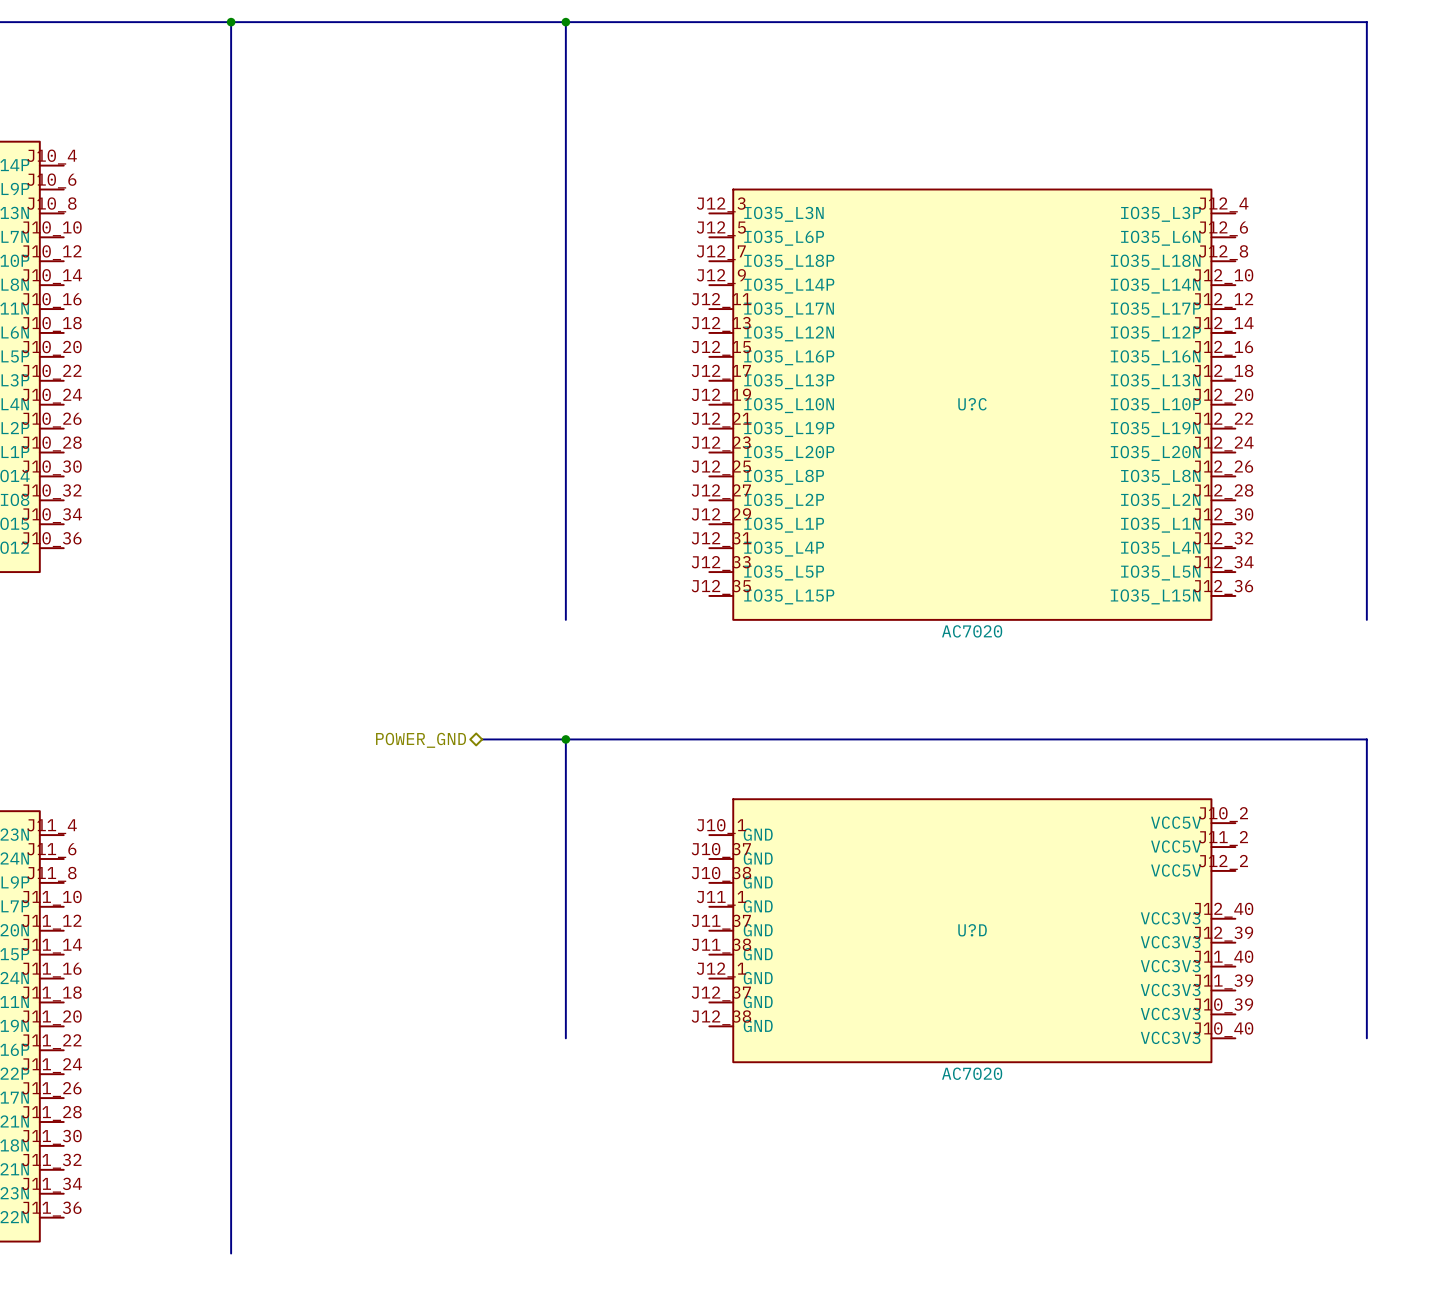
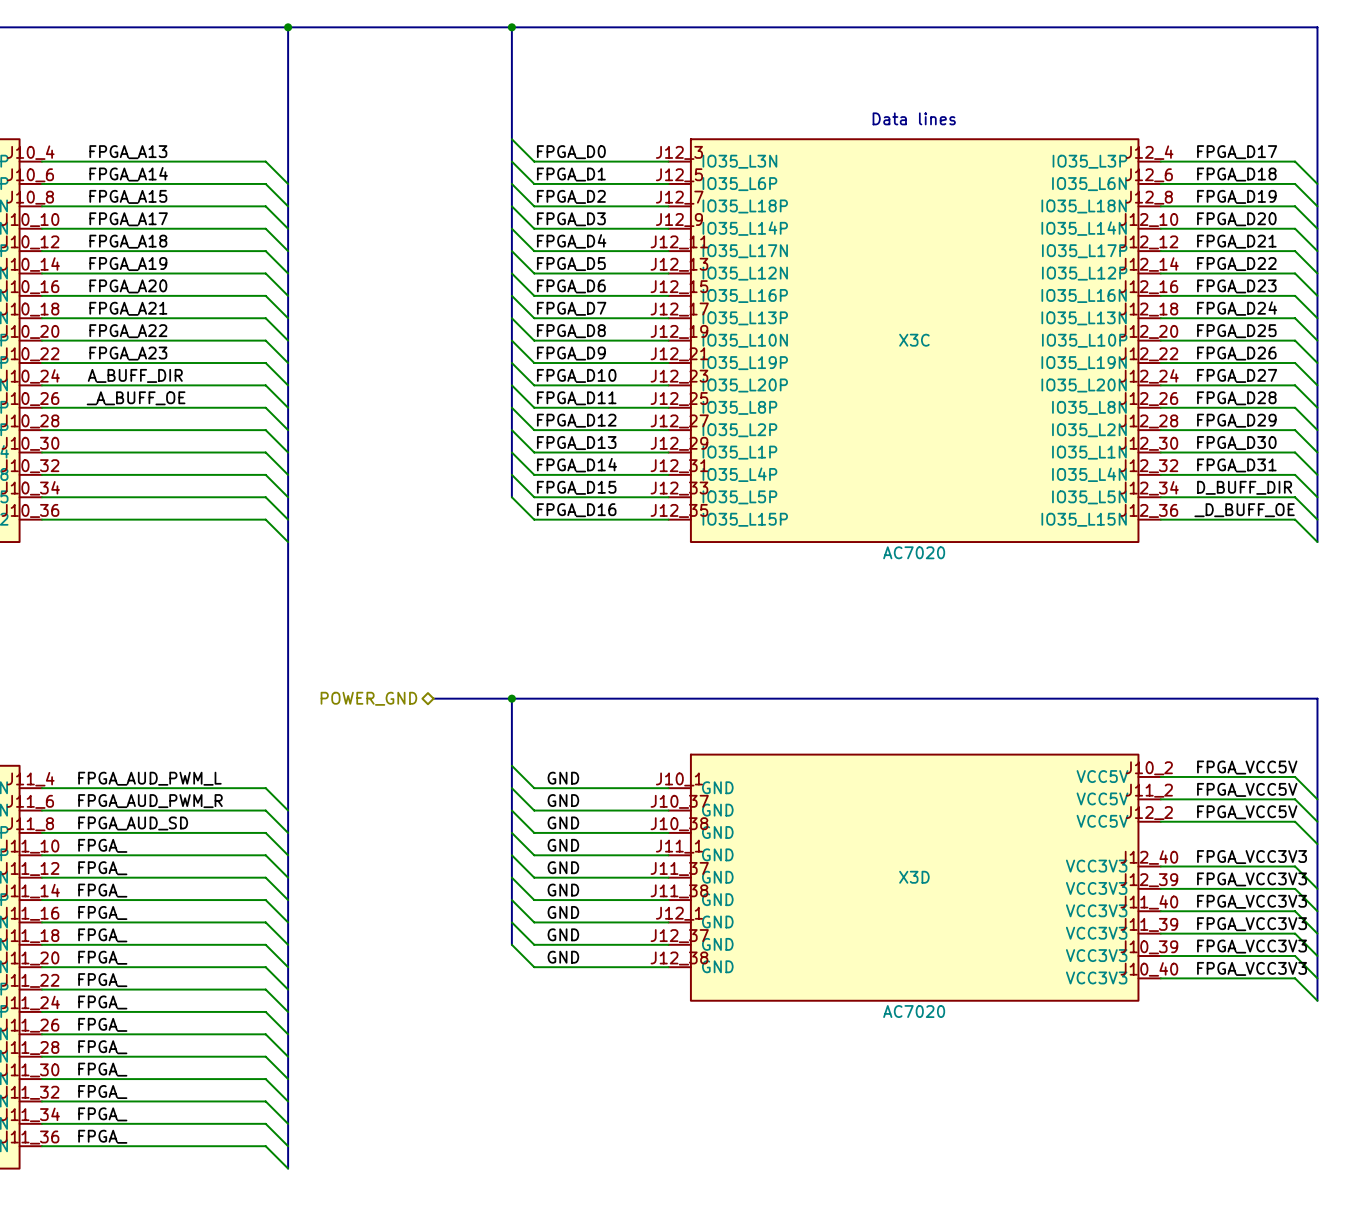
bus: (231, 22) (231, 1253) -> none
junction: (231, 22) -> none
bus: none -> (288, 27) (288, 1168)
junction: none -> (288, 27)
bus: (1366, 22) (1366, 619) -> (1261, 27) (1317, 27) (1317, 542)
text: none -> Data lines (914, 118)
wire: none -> (511, 139) (534, 161) (668, 161)
label: none -> FPGA_A13 (128, 152)
label: none -> FPGA_D0 (571, 152)
label: none -> FPGA_D17 (1237, 152)
wire: none -> (41, 161) (265, 161) (288, 183)
wire: none -> (511, 161) (534, 183) (668, 183)
wire: none -> (1160, 161) (1295, 161) (1317, 183)
label: none -> FPGA_A14 (128, 174)
label: none -> FPGA_D1 (571, 174)
label: none -> FPGA_D18 (1236, 174)
wire: none -> (41, 183) (265, 183) (288, 206)
wire: none -> (511, 183) (534, 206) (668, 206)
wire: none -> (1160, 183) (1295, 183) (1317, 206)
label: none -> FPGA_A15 (128, 196)
label: none -> FPGA_D2 (571, 196)
label: none -> FPGA_D19 (1236, 196)
wire: none -> (41, 206) (265, 206) (288, 228)
wire: none -> (511, 206) (534, 228) (668, 228)
wire: none -> (1160, 206) (1295, 206) (1317, 228)
label: none -> FPGA_A17 (128, 219)
label: none -> FPGA_D3 (571, 219)
label: none -> FPGA_D20 (1236, 219)
wire: none -> (41, 228) (265, 228) (288, 251)
wire: none -> (511, 228) (534, 251) (668, 251)
wire: none -> (1160, 228) (1295, 228) (1317, 251)
label: none -> FPGA_A18 (128, 241)
label: none -> FPGA_D4 (571, 241)
label: none -> FPGA_D21 (1236, 241)
wire: none -> (41, 251) (265, 251) (288, 273)
wire: none -> (511, 251) (534, 273) (668, 273)
wire: none -> (1160, 251) (1295, 251) (1317, 273)
label: none -> FPGA_A19 (128, 264)
label: none -> FPGA_D5 (571, 264)
label: none -> FPGA_D22 (1236, 264)
wire: none -> (41, 273) (265, 273) (288, 295)
wire: none -> (511, 273) (534, 295) (668, 295)
wire: none -> (1160, 273) (1295, 273) (1317, 295)
label: none -> FPGA_A20 (128, 286)
label: none -> FPGA_D6 (571, 286)
label: none -> FPGA_D23 (1236, 286)
wire: none -> (41, 295) (265, 295) (288, 318)
wire: none -> (511, 295) (534, 318) (668, 318)
wire: none -> (1160, 295) (1295, 295) (1317, 318)
label: none -> FPGA_A21 (128, 308)
label: none -> FPGA_D7 (571, 308)
label: none -> FPGA_D24 (1237, 308)
wire: none -> (41, 318) (265, 318) (288, 340)
wire: none -> (511, 318) (534, 340) (668, 340)
wire: none -> (1160, 318) (1295, 318) (1317, 340)
label: none -> FPGA_A22 (128, 331)
label: none -> FPGA_D8 (571, 331)
label: none -> FPGA_D25 (1236, 331)
wire: none -> (41, 340) (265, 340) (288, 363)
wire: none -> (511, 340) (534, 363) (668, 363)
X3C: none -> AC7020 (914, 340)
wire: none -> (1160, 340) (1295, 340) (1317, 363)
label: none -> FPGA_A23 (128, 353)
label: none -> FPGA_D9 (571, 353)
label: none -> FPGA_D26 (1236, 353)
wire: none -> (41, 363) (265, 363) (288, 385)
wire: none -> (511, 363) (534, 385) (668, 385)
wire: none -> (1160, 363) (1295, 363) (1317, 385)
label: none -> A_BUFF_DIR (135, 375)
label: none -> FPGA_D10 (576, 375)
label: none -> FPGA_D27 (1237, 375)
wire: none -> (41, 385) (265, 385) (288, 407)
wire: none -> (511, 385) (534, 407) (668, 407)
U?C: AC7020 (972, 404) -> none
wire: none -> (1160, 385) (1295, 385) (1317, 407)
label: none -> _A_BUFF_OE (136, 398)
label: none -> FPGA_D11 (576, 398)
label: none -> FPGA_D28 (1236, 398)
wire: none -> (41, 407) (265, 407) (288, 430)
wire: none -> (511, 407) (534, 430) (668, 430)
wire: none -> (1160, 407) (1295, 407) (1317, 430)
label: none -> FPGA_D12 (576, 420)
label: none -> FPGA_D29 (1236, 420)
wire: none -> (41, 430) (265, 430) (288, 452)
wire: none -> (511, 430) (534, 452) (668, 452)
wire: none -> (1160, 430) (1295, 430) (1317, 452)
label: none -> FPGA_D13 (576, 443)
label: none -> FPGA_D30 (1236, 443)
wire: none -> (41, 452) (265, 452) (288, 474)
wire: none -> (511, 452) (534, 474) (668, 474)
wire: none -> (1160, 452) (1295, 452) (1317, 474)
label: none -> FPGA_D14 (576, 465)
label: none -> FPGA_D31 (1236, 465)
wire: none -> (41, 474) (265, 474) (288, 497)
wire: none -> (511, 474) (534, 497) (668, 497)
wire: none -> (1160, 474) (1295, 474) (1317, 497)
label: none -> FPGA_D15 (576, 487)
label: none -> D_BUFF_DIR (1244, 487)
wire: none -> (41, 497) (265, 497) (288, 519)
bus: (565, 524) (565, 619) -> none
wire: none -> (511, 497) (534, 519) (668, 519)
wire: none -> (1160, 497) (1295, 497) (1317, 519)
label: none -> FPGA_D16 (576, 510)
label: none -> _D_BUFF_OE (1244, 510)
wire: none -> (41, 519) (265, 519) (288, 542)
wire: none -> (1160, 519) (1295, 519) (1317, 542)
bus: (1366, 739) (1366, 1038) -> (1261, 698) (1317, 698) (1317, 1000)
wire: none -> (511, 765) (534, 788) (668, 788)
label: none -> FPGA_VCC5V (1247, 767)
wire: none -> (1160, 776) (1295, 776) (1317, 799)
label: none -> GND (563, 778)
label: none -> FPGA_AUD_PWM_L (149, 778)
wire: none -> (41, 788) (265, 788) (288, 810)
wire: none -> (511, 788) (534, 810) (668, 810)
label: none -> FPGA_VCC5V (1247, 789)
wire: none -> (1160, 799) (1295, 799) (1317, 821)
label: none -> GND (563, 800)
label: none -> FPGA_AUD_PWM_R (150, 801)
wire: none -> (41, 810) (265, 810) (288, 832)
wire: none -> (511, 810) (534, 832) (668, 832)
label: none -> FPGA_VCC5V (1247, 812)
wire: none -> (1160, 821) (1295, 821) (1317, 844)
label: none -> GND (563, 822)
label: none -> FPGA_AUD_SD (133, 823)
wire: none -> (41, 832) (265, 832) (288, 855)
wire: none -> (511, 832) (534, 855) (668, 855)
label: none -> GND (563, 845)
label: none -> FPGA_ (102, 845)
wire: none -> (41, 855) (265, 855) (288, 877)
wire: none -> (511, 855) (534, 877) (668, 877)
label: none -> FPGA_VCC3V3 (1252, 857)
wire: none -> (1160, 866) (1295, 866) (1317, 888)
label: none -> GND (563, 867)
label: none -> FPGA_ (102, 868)
wire: none -> (41, 877) (265, 877) (288, 900)
wire: none -> (511, 877) (534, 900) (668, 900)
U?D: AC7020 (972, 930) -> none
X3D: none -> AC7020 (914, 877)
label: none -> FPGA_VCC3V3 (1252, 879)
wire: none -> (1160, 888) (1295, 888) (1317, 911)
label: none -> GND (563, 890)
label: none -> FPGA_ (102, 890)
wire: none -> (41, 900) (265, 900) (288, 922)
wire: none -> (511, 900) (534, 922) (668, 922)
label: none -> FPGA_VCC3V3 (1252, 901)
wire: none -> (1160, 911) (1295, 911) (1317, 933)
label: none -> GND (563, 912)
label: none -> FPGA_ (102, 912)
wire: none -> (41, 922) (265, 922) (288, 944)
wire: none -> (511, 922) (534, 944) (668, 944)
label: none -> FPGA_VCC3V3 (1252, 924)
wire: none -> (1160, 933) (1295, 933) (1317, 956)
label: none -> GND (563, 934)
label: none -> FPGA_ (102, 935)
wire: none -> (41, 944) (265, 944) (288, 967)
bus: (565, 1002) (565, 1038) -> none
wire: none -> (511, 944) (534, 967) (668, 967)
label: none -> FPGA_VCC3V3 (1252, 946)
wire: none -> (1160, 956) (1295, 956) (1317, 978)
label: none -> GND (563, 957)
label: none -> FPGA_ (102, 957)
wire: none -> (41, 967) (265, 967) (288, 989)
label: none -> FPGA_VCC3V3 (1252, 968)
wire: none -> (1160, 978) (1295, 978) (1317, 1000)
label: none -> FPGA_ (102, 980)
wire: none -> (41, 989) (265, 989) (288, 1011)
label: none -> FPGA_ (102, 1002)
wire: none -> (41, 1011) (265, 1011) (288, 1034)
label: none -> FPGA_ (102, 1024)
wire: none -> (41, 1034) (265, 1034) (288, 1056)
label: none -> FPGA_ (102, 1047)
wire: none -> (41, 1056) (265, 1056) (288, 1079)
label: none -> FPGA_ (102, 1069)
wire: none -> (41, 1079) (265, 1079) (288, 1101)
label: none -> FPGA_ (102, 1092)
wire: none -> (41, 1101) (265, 1101) (288, 1123)
label: none -> FPGA_ (102, 1114)
wire: none -> (41, 1123) (265, 1123) (288, 1146)
label: none -> FPGA_ (102, 1136)
wire: none -> (41, 1146) (265, 1146) (288, 1168)

